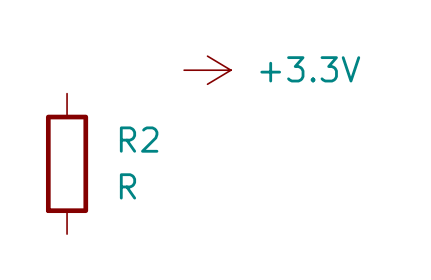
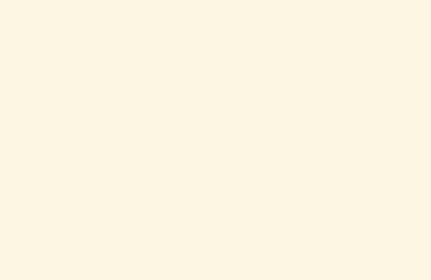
power symbol: +3.3V (207, 70) -> none
R2: R (67, 163) -> none

